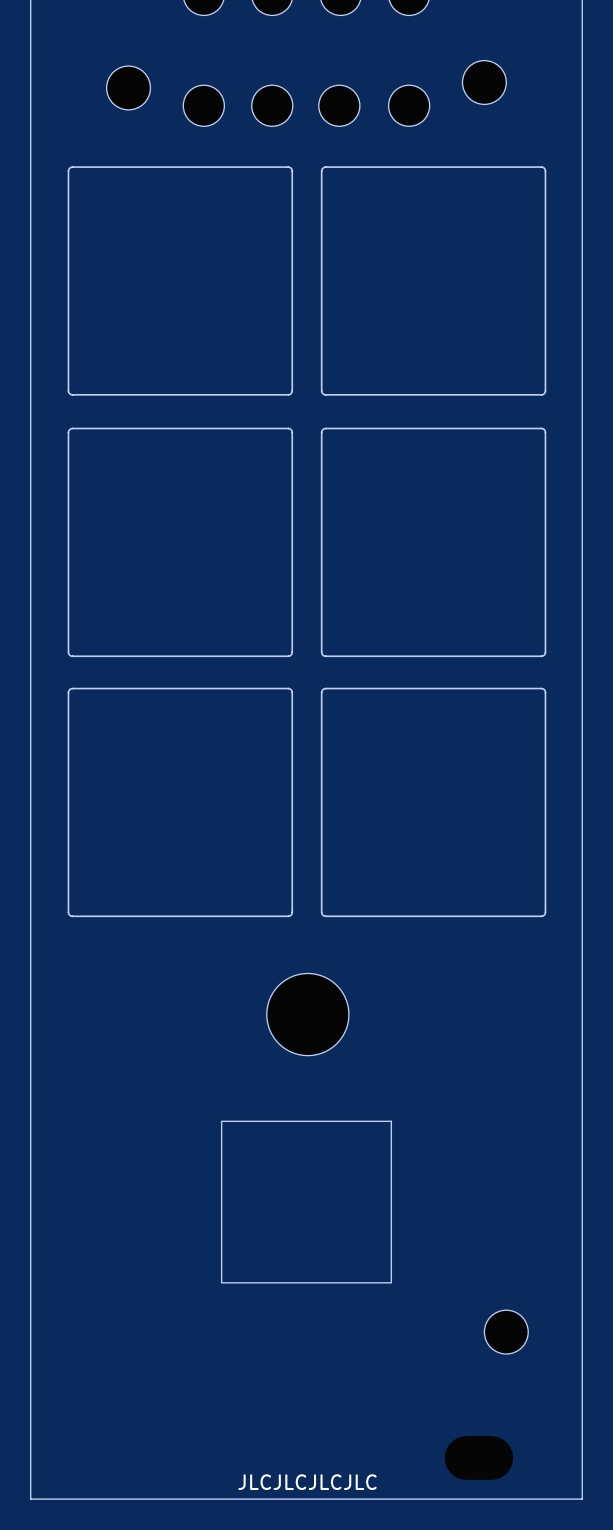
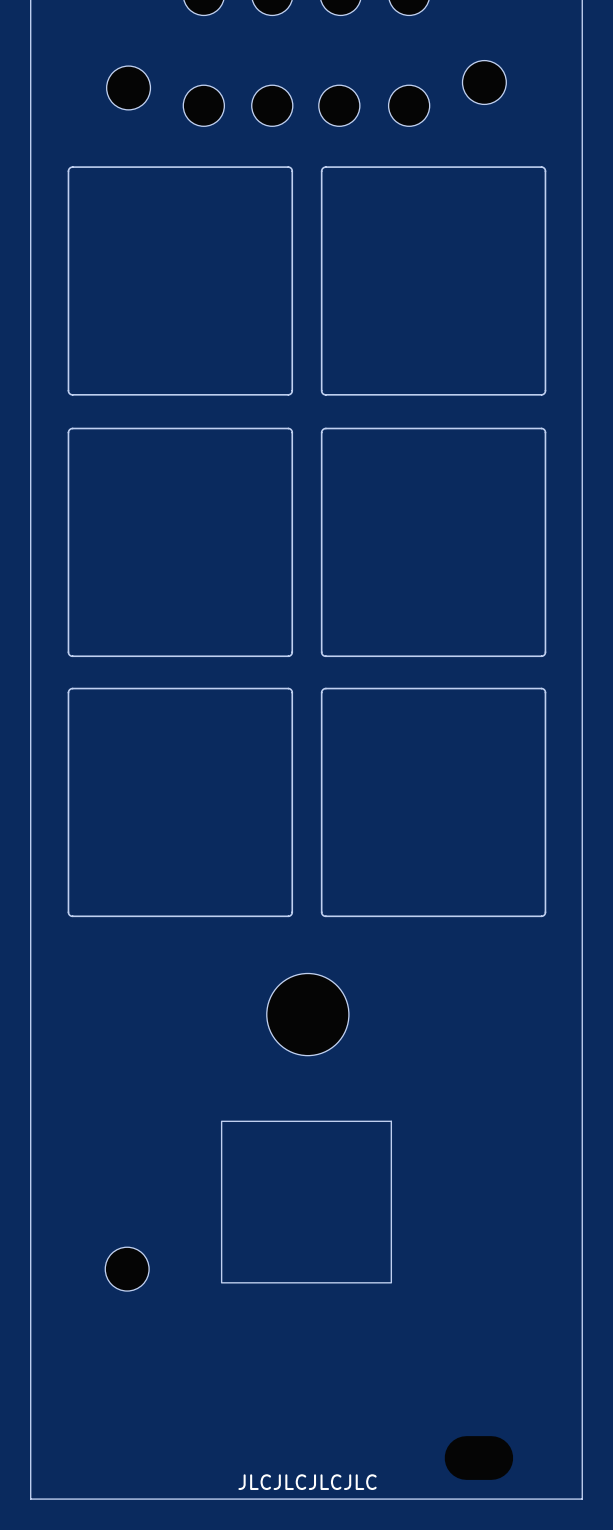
part: none -> (127, 1269)
part: (506, 1332) -> none

